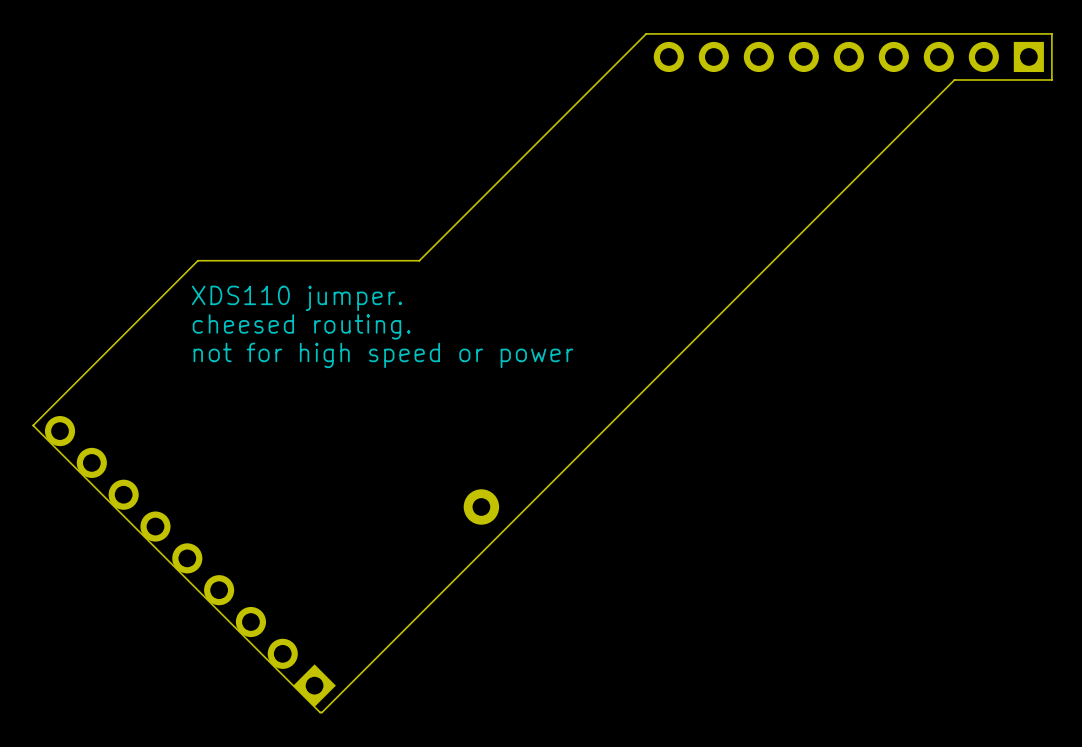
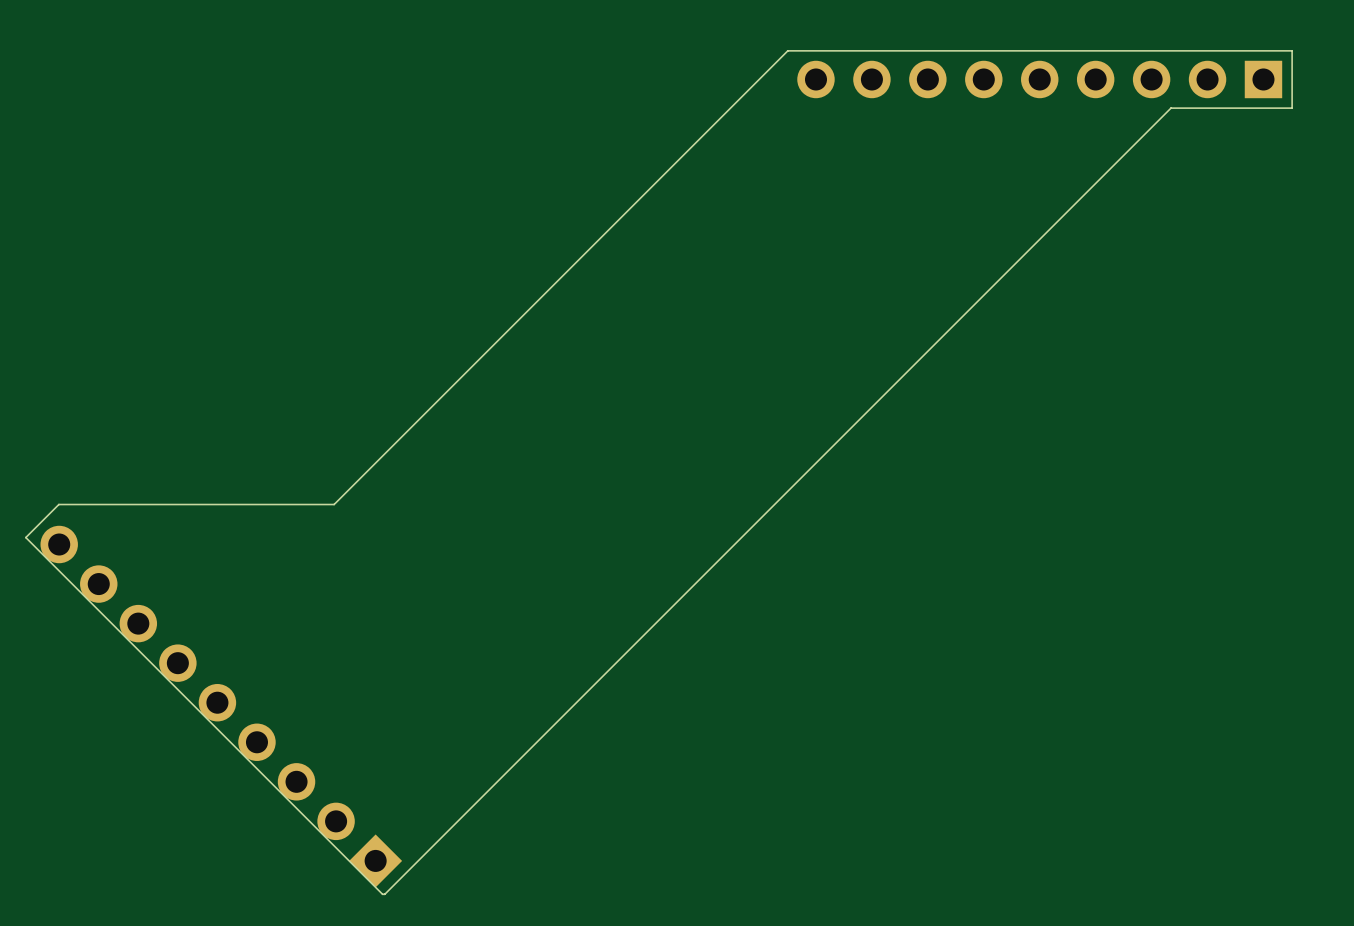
board edge: (419, 260) (197, 260) (59, 398) -> (505, 332) (334, 504) (58, 504)
text: XDS110 jumper. (296, 298) -> none
text: cheesed routing. (301, 326) -> none
text: not for high speed or power (383, 355) -> none
part: (481, 506) -> none

